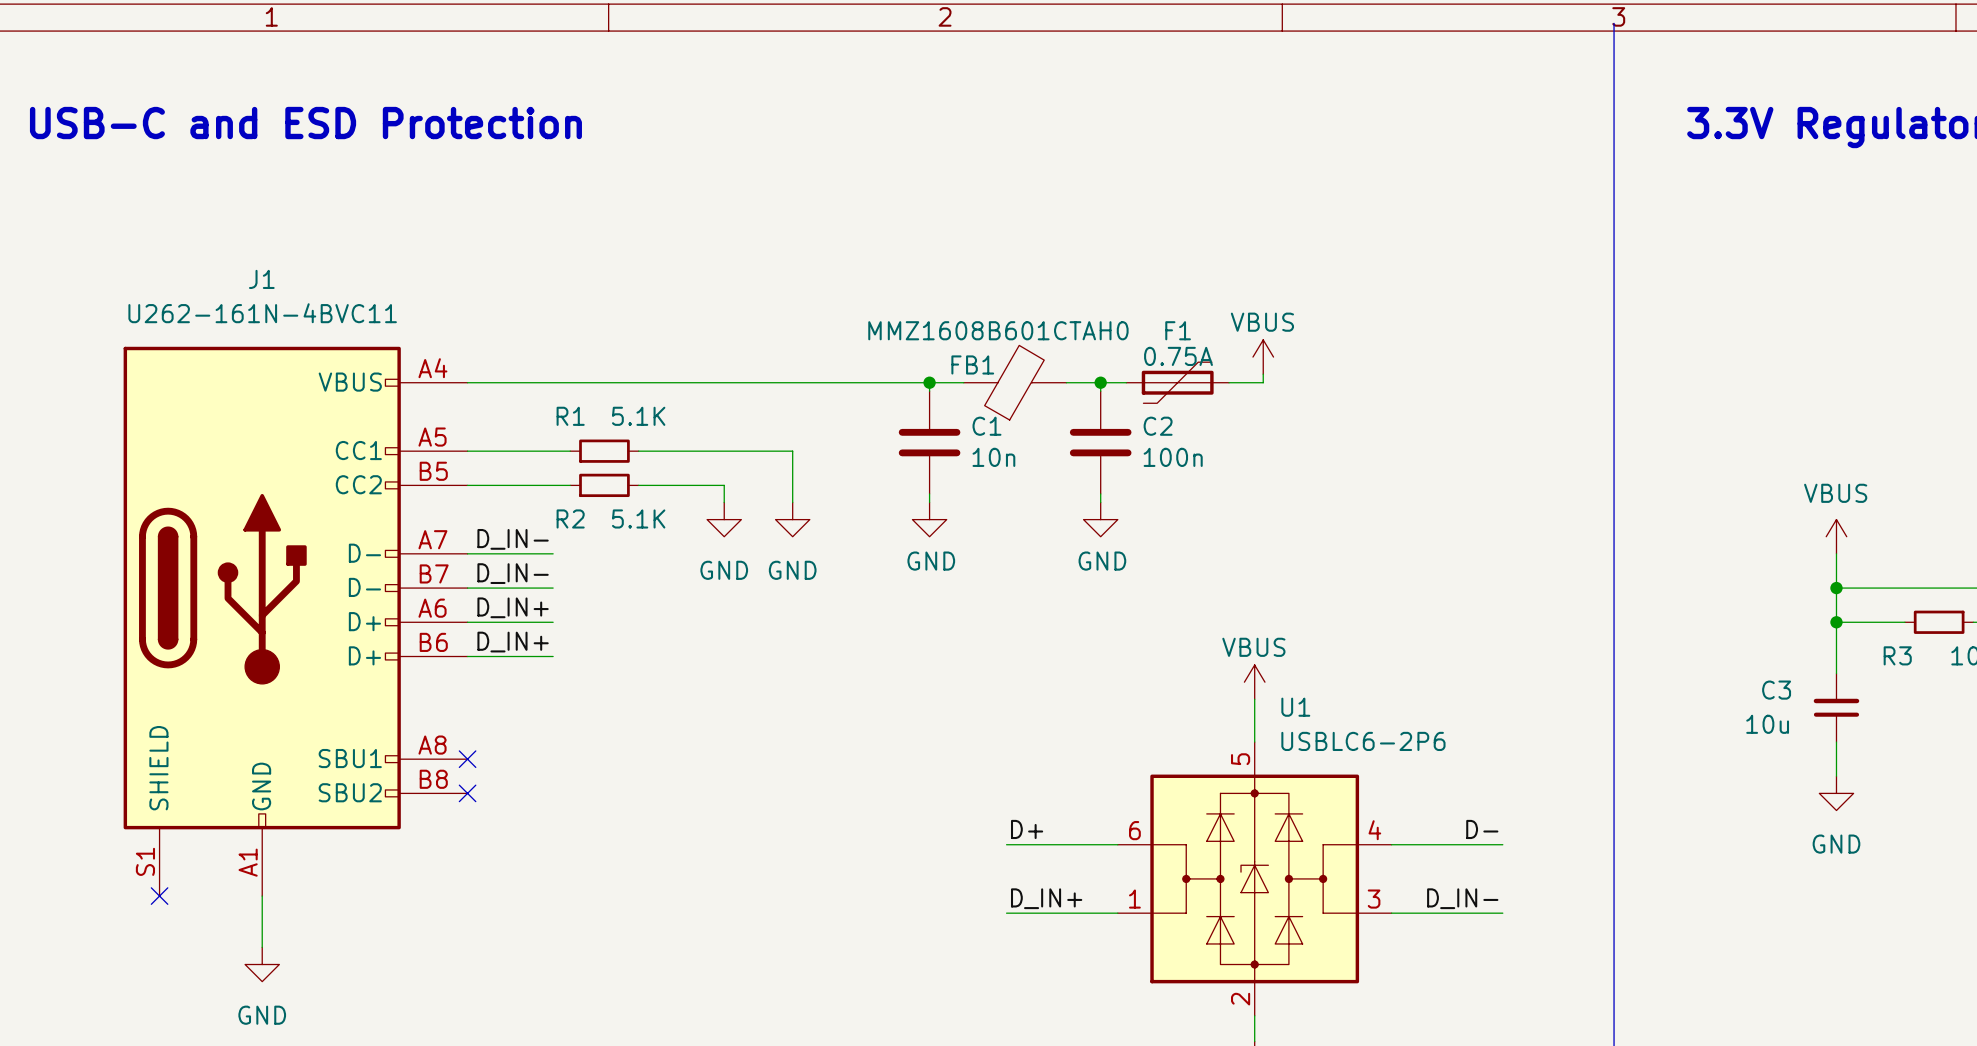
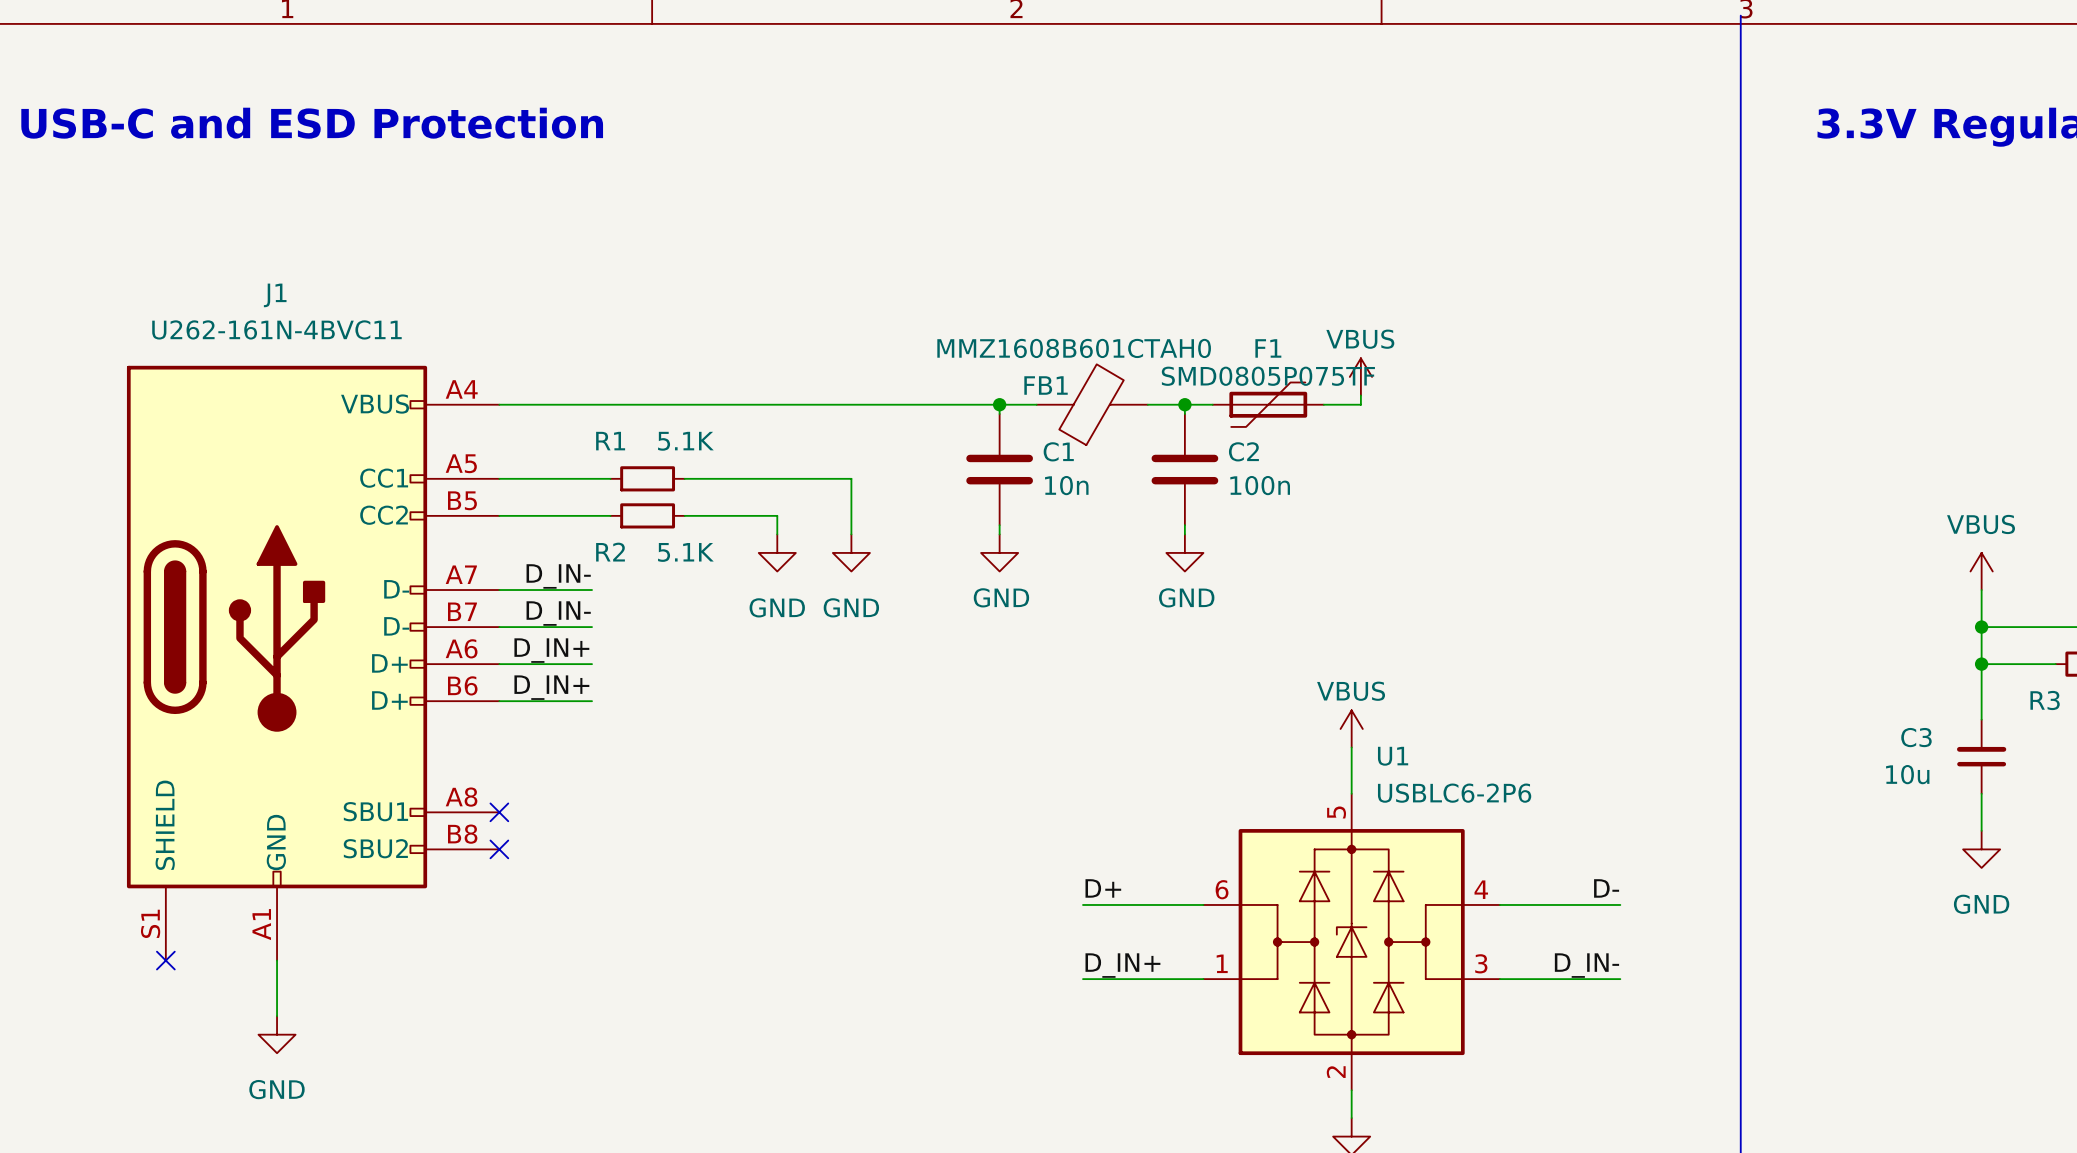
F1 value: 0.75A (1178, 356) -> SMD0805P075TF (1268, 376)

